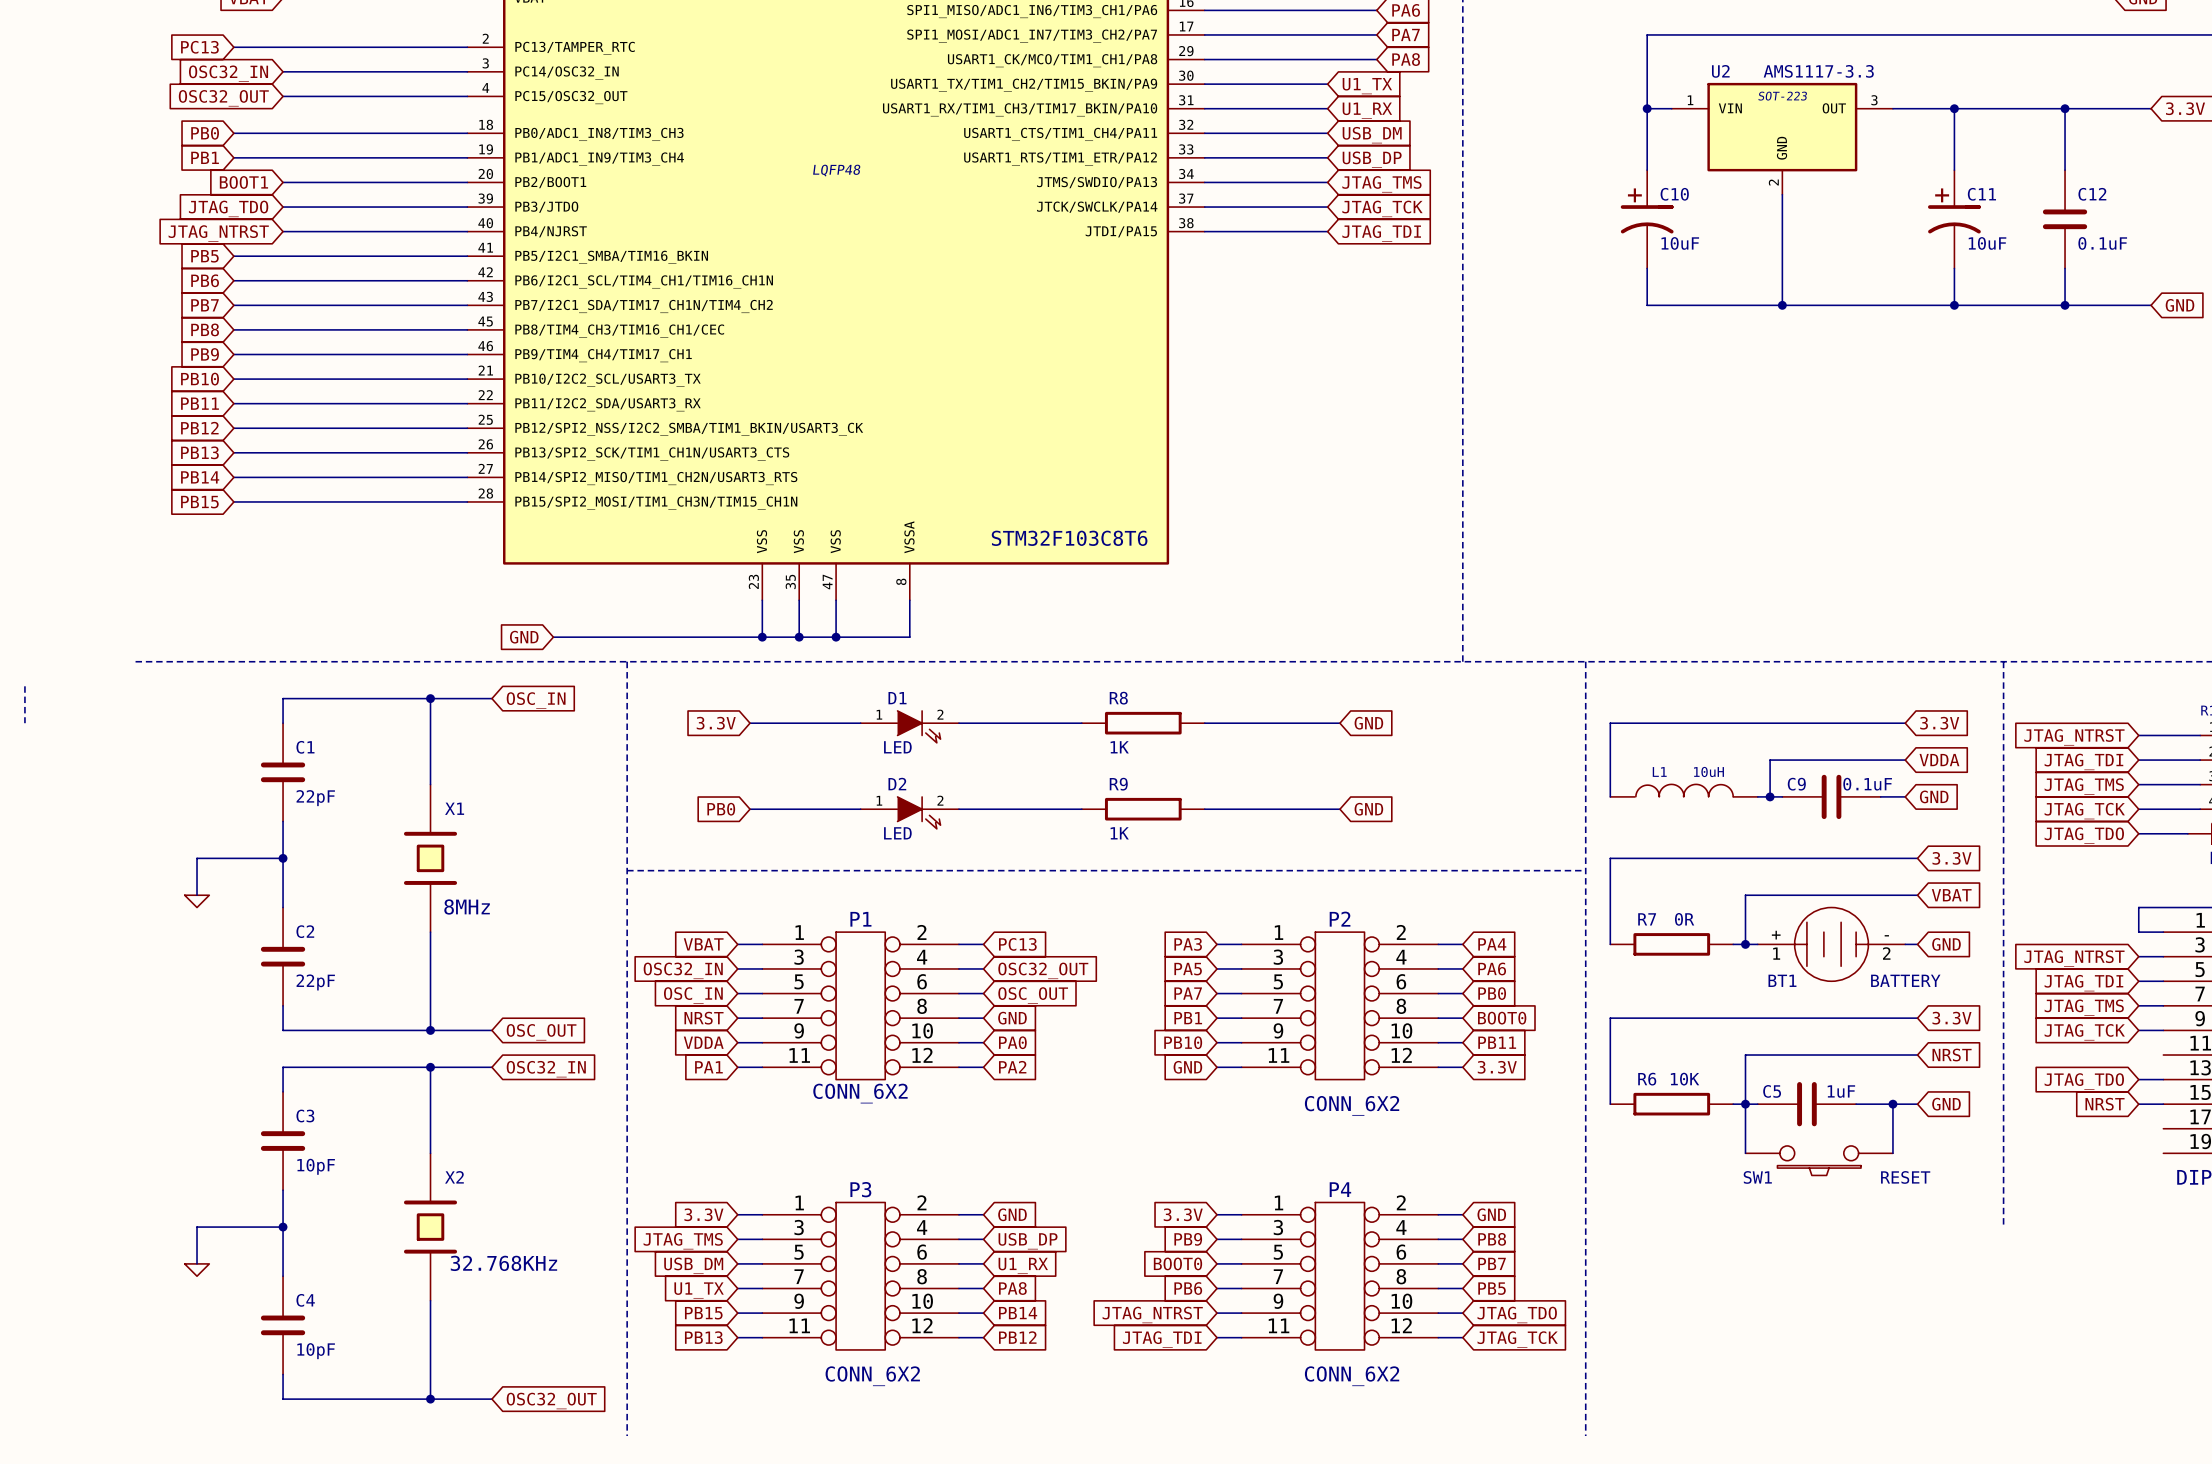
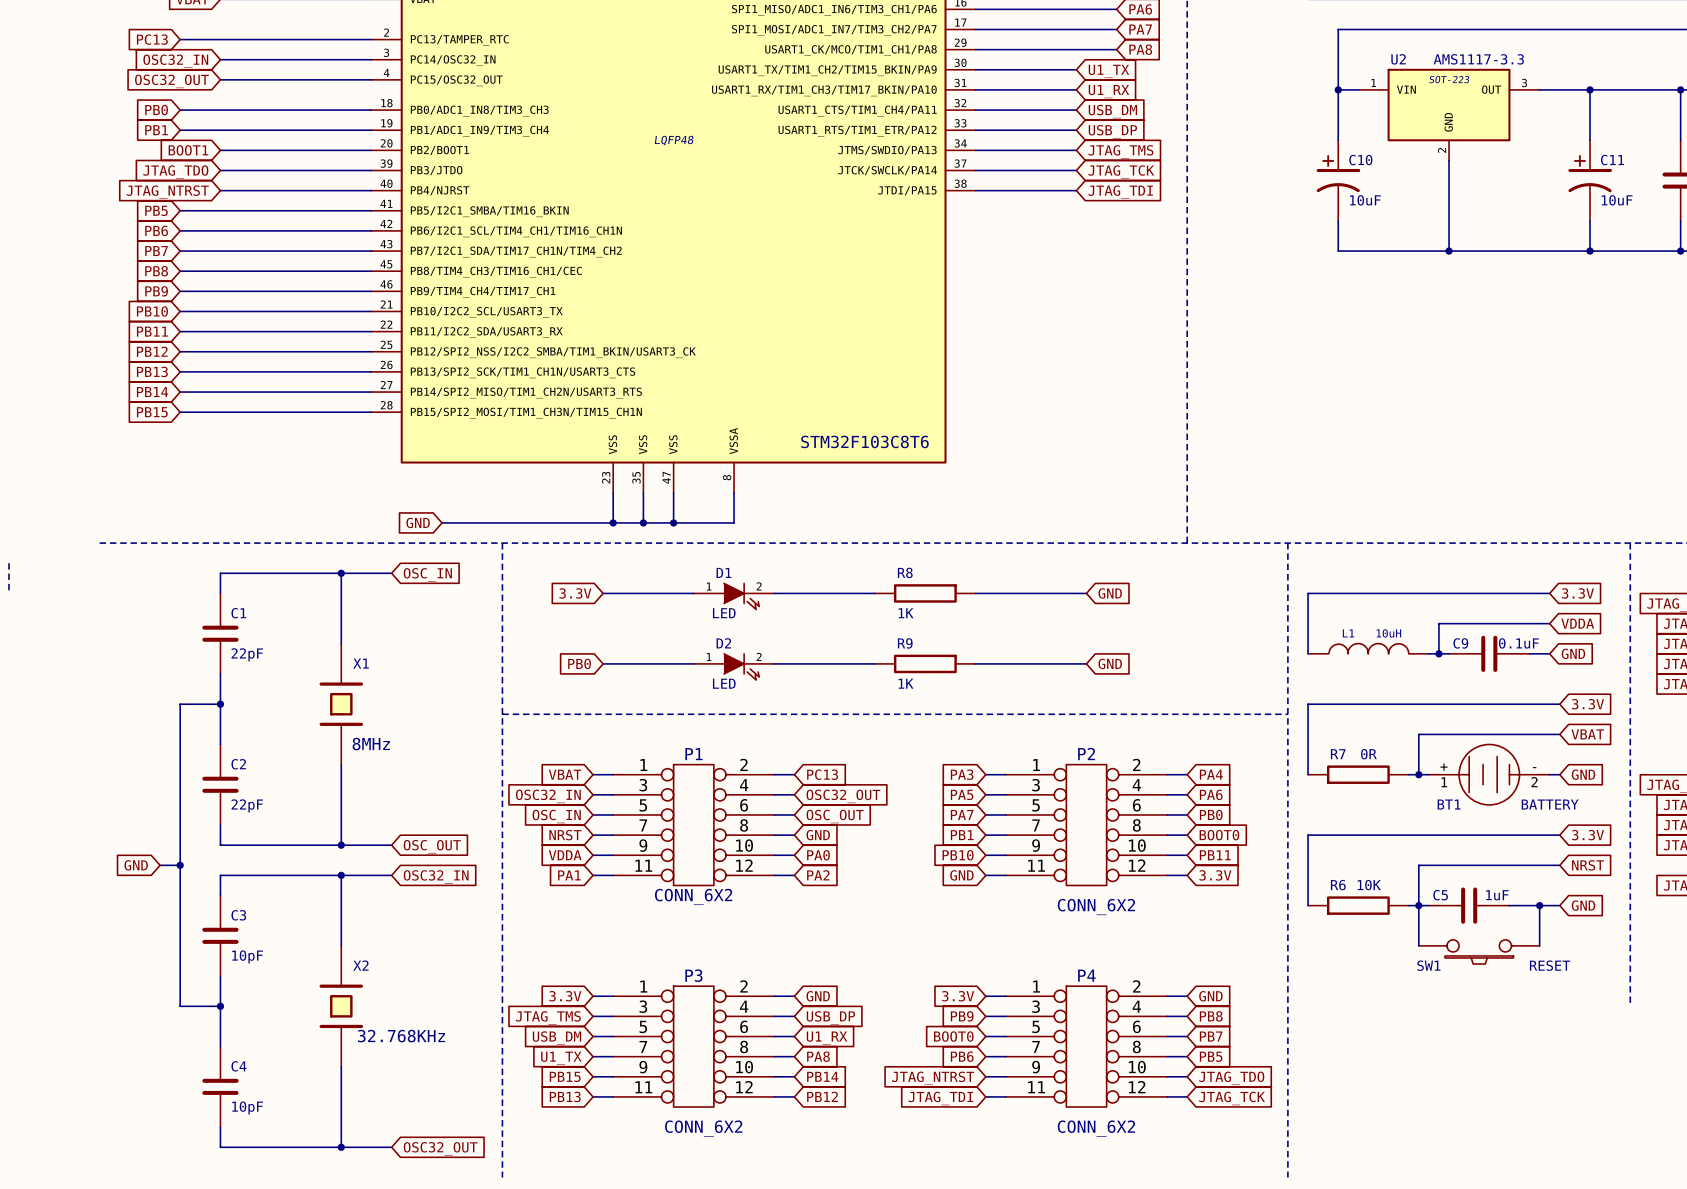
wire: (233, 858) (197, 858) (197, 895) -> (180, 704) (180, 1006)
power symbol: (197, 901) -> none
global label: none -> GND (136, 865)
wire: none -> (160, 865) (180, 865)
junction: none -> (180, 865)
wire: (233, 1227) (197, 1227) (197, 1263) -> none
power symbol: (197, 1270) -> none

